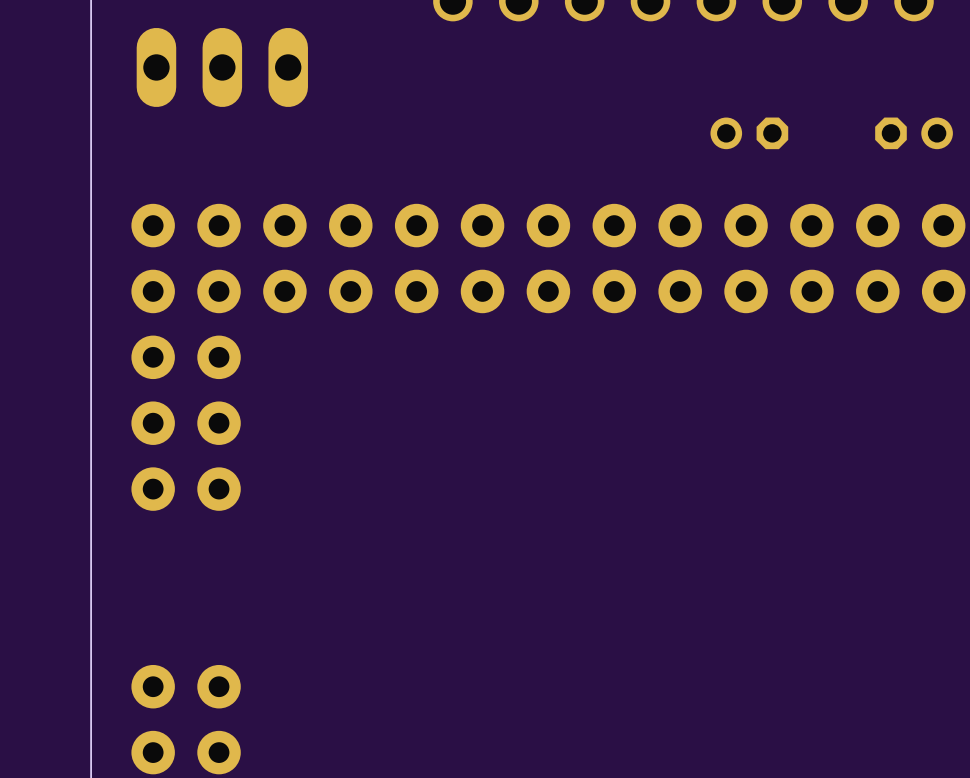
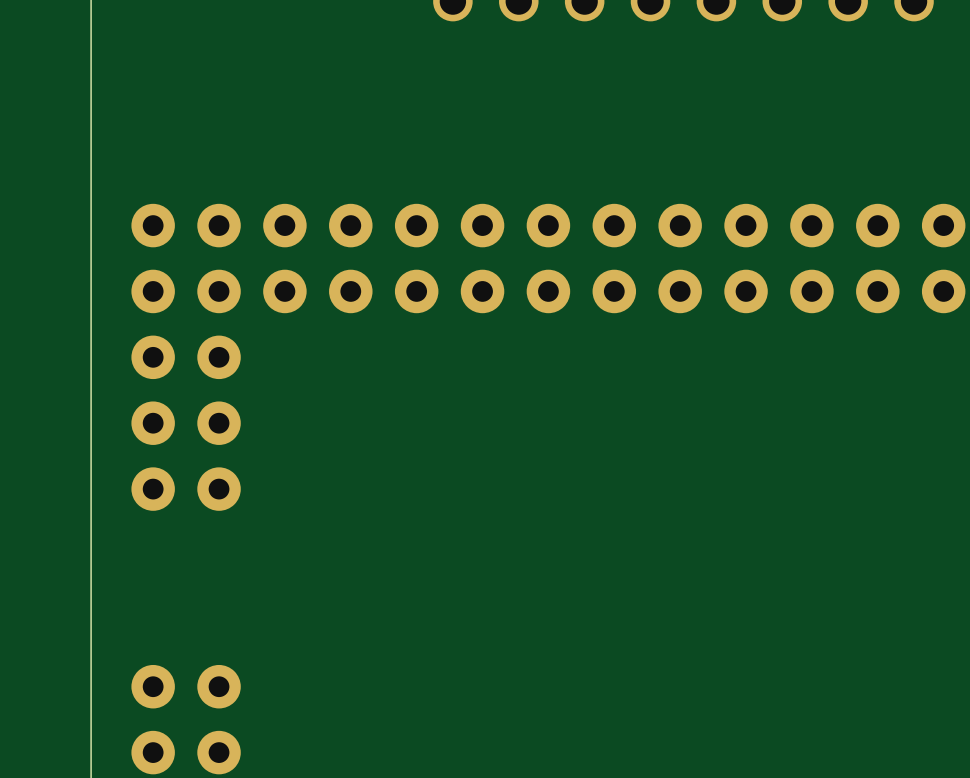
part: (222, 67) -> none
part: (749, 133) -> none
part: (914, 133) -> none

